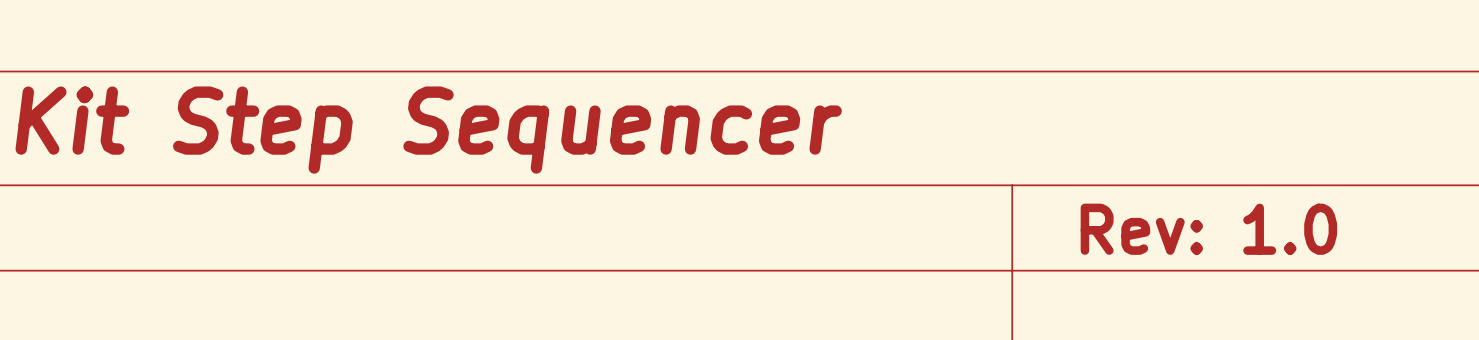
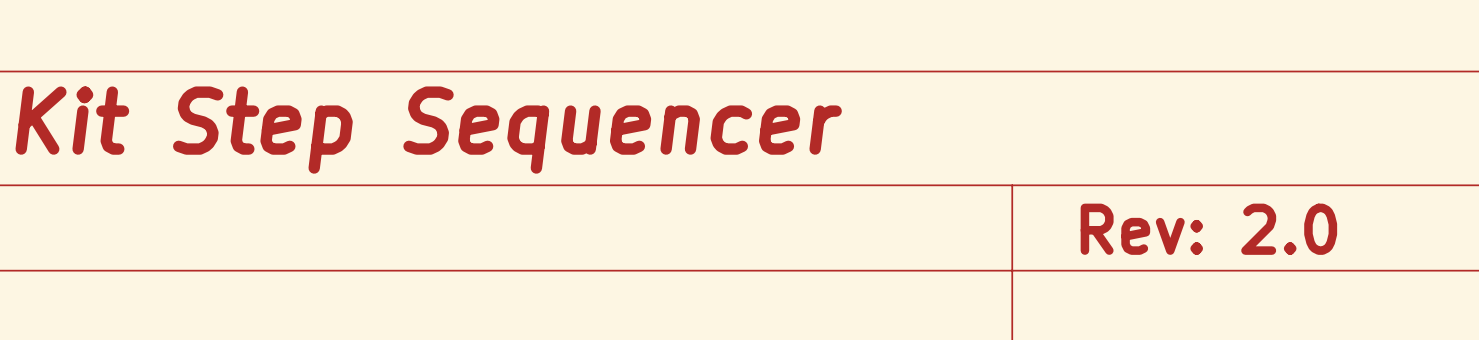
title block: Rev: 1.0 (1208, 229) -> Rev: 2.0 (1208, 229)

